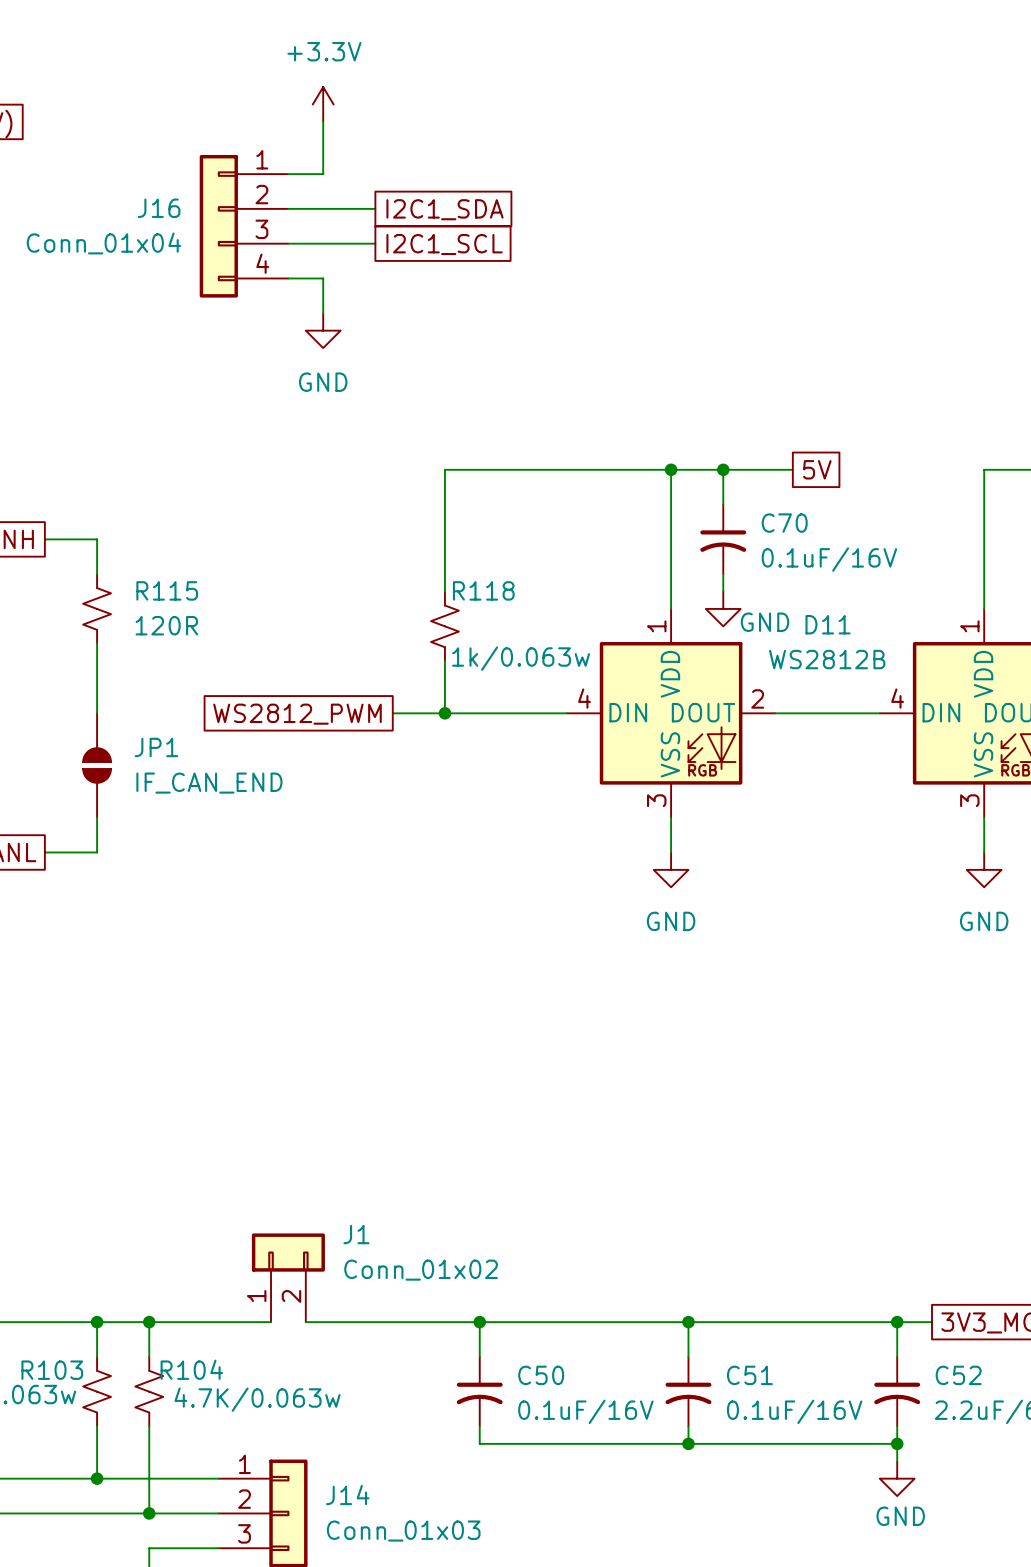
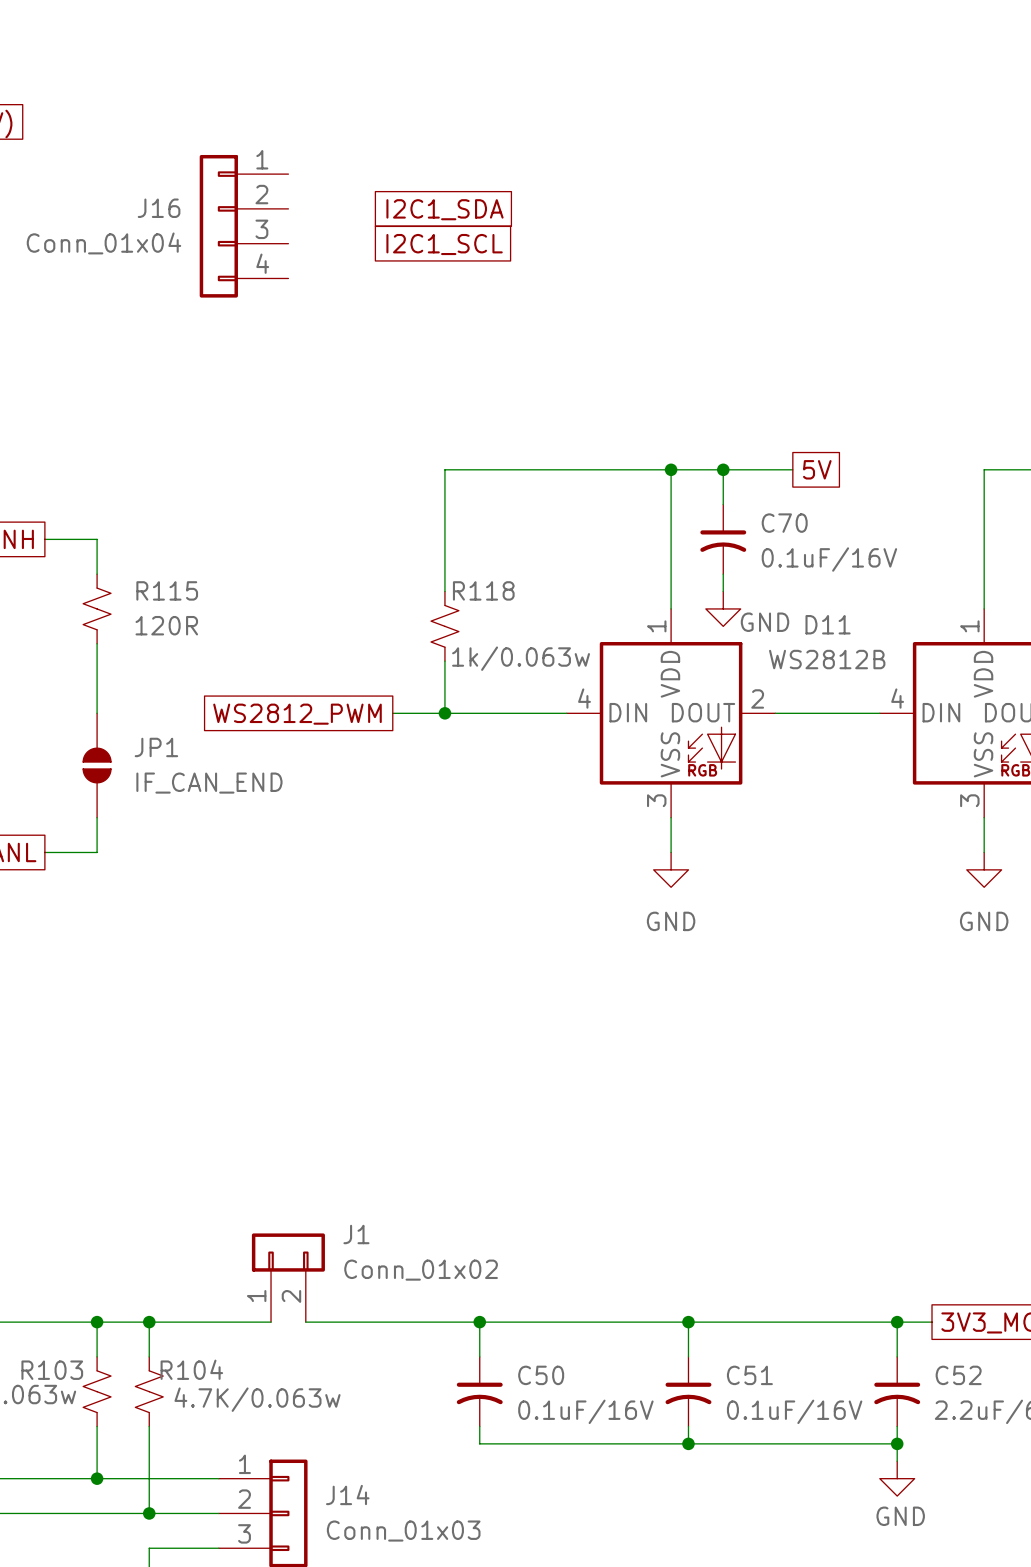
power symbol: +3.3V (323, 104) -> none
wire: (323, 121) (323, 174) (288, 174) -> none
wire: (288, 208) (375, 208) -> none
wire: (288, 243) (375, 243) -> none
wire: (288, 278) (323, 278) (323, 313) -> none
power symbol: GND (323, 330) -> none

